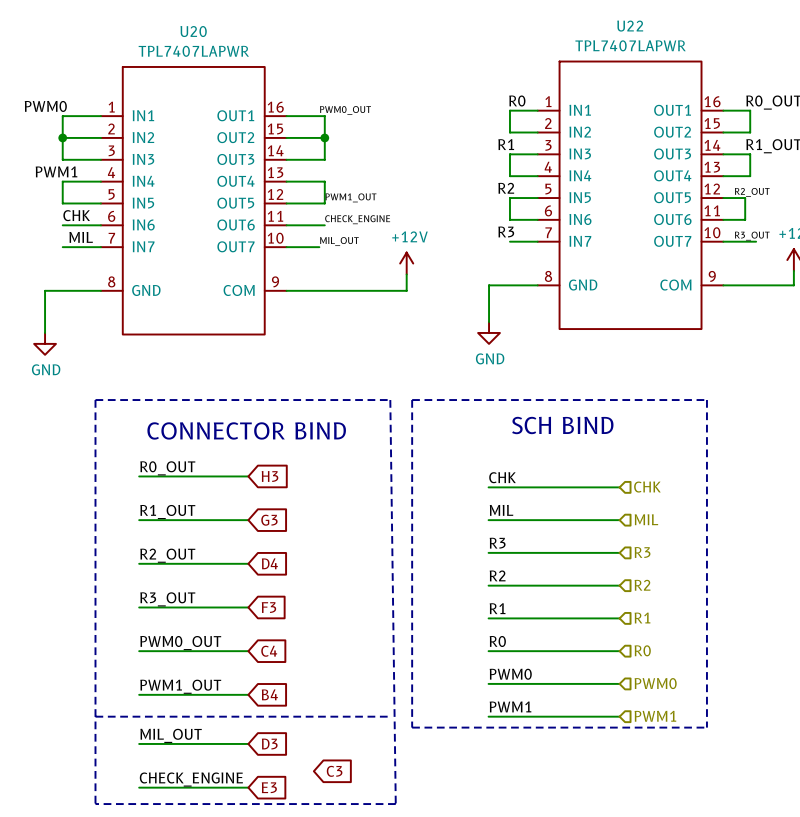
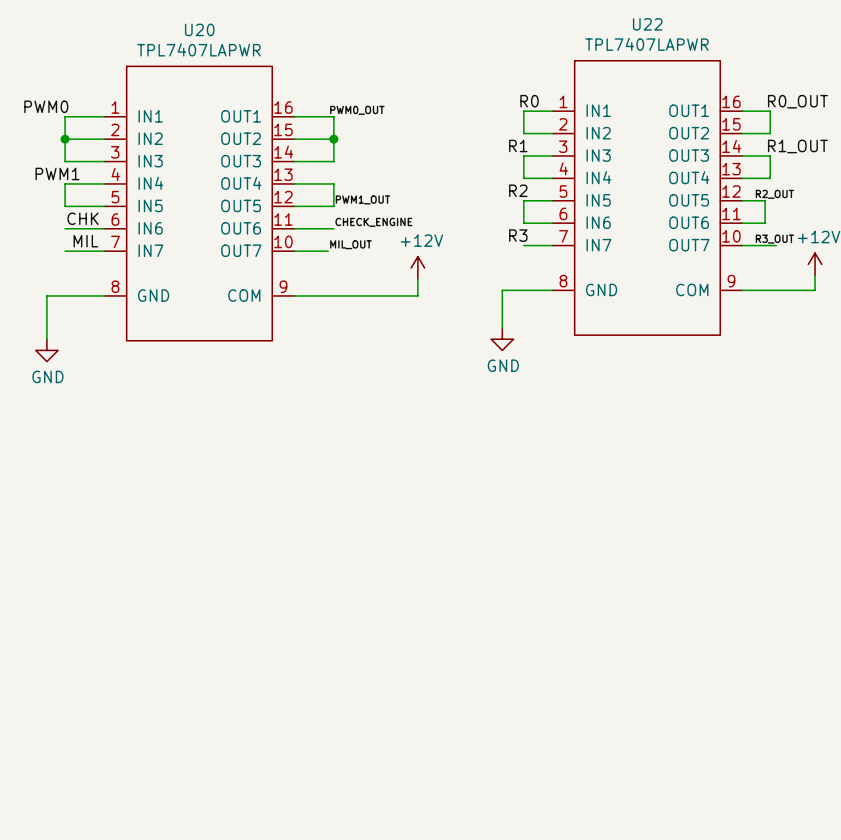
line: (95, 400) (95, 804) (395, 804) (390, 400) (95, 400) -> none
line: (412, 400) (706, 400) (706, 727) (412, 727) (412, 400) -> none
text: SCH BIND (562, 425) -> none
text: CONNECTOR BIND (246, 430) -> none
label: R0_OUT (167, 468) -> none
wire: (139, 476) (248, 476) -> none
global label: H3 (270, 476) -> none
label: CHK (502, 477) -> none
wire: (488, 487) (619, 487) -> none
hierarchical label: CHK (647, 487) -> none
label: MIL (501, 510) -> none
label: R1_OUT (167, 512) -> none
hierarchical label: MIL (646, 519) -> none
wire: (139, 520) (248, 520) -> none
global label: G3 (269, 520) -> none
wire: (488, 520) (619, 520) -> none
label: R3 (497, 543) -> none
wire: (488, 552) (619, 552) -> none
hierarchical label: R3 (642, 552) -> none
label: R2_OUT (167, 555) -> none
wire: (139, 563) (248, 563) -> none
global label: D4 (269, 563) -> none
label: R2 (497, 575) -> none
wire: (488, 585) (619, 585) -> none
hierarchical label: R2 (642, 585) -> none
label: R3_OUT (167, 599) -> none
wire: (139, 607) (248, 607) -> none
global label: F3 (268, 607) -> none
label: R1 (497, 608) -> none
wire: (488, 618) (619, 618) -> none
hierarchical label: R1 (642, 618) -> none
label: R0 (497, 641) -> none
label: PWM0_OUT (180, 643) -> none
hierarchical label: R0 (642, 650) -> none
wire: (139, 651) (248, 651) -> none
global label: C4 (269, 651) -> none
wire: (488, 651) (619, 651) -> none
label: PWM0 (510, 674) -> none
wire: (488, 683) (619, 683) -> none
hierarchical label: PWM0 (655, 683) -> none
label: PWM1_OUT (180, 686) -> none
wire: (139, 694) (248, 694) -> none
global label: B4 (269, 694) -> none
label: PWM1 (510, 706) -> none
line: (95, 716) (390, 716) -> none
wire: (488, 716) (619, 716) -> none
hierarchical label: PWM1 (655, 716) -> none
label: MIL_OUT (171, 735) -> none
wire: (139, 743) (248, 743) -> none
global label: D3 (269, 744) -> none
global label: C3 (334, 771) -> none
label: CHECK_ENGINE (191, 779) -> none
wire: (139, 787) (248, 787) -> none
global label: E3 (269, 787) -> none

